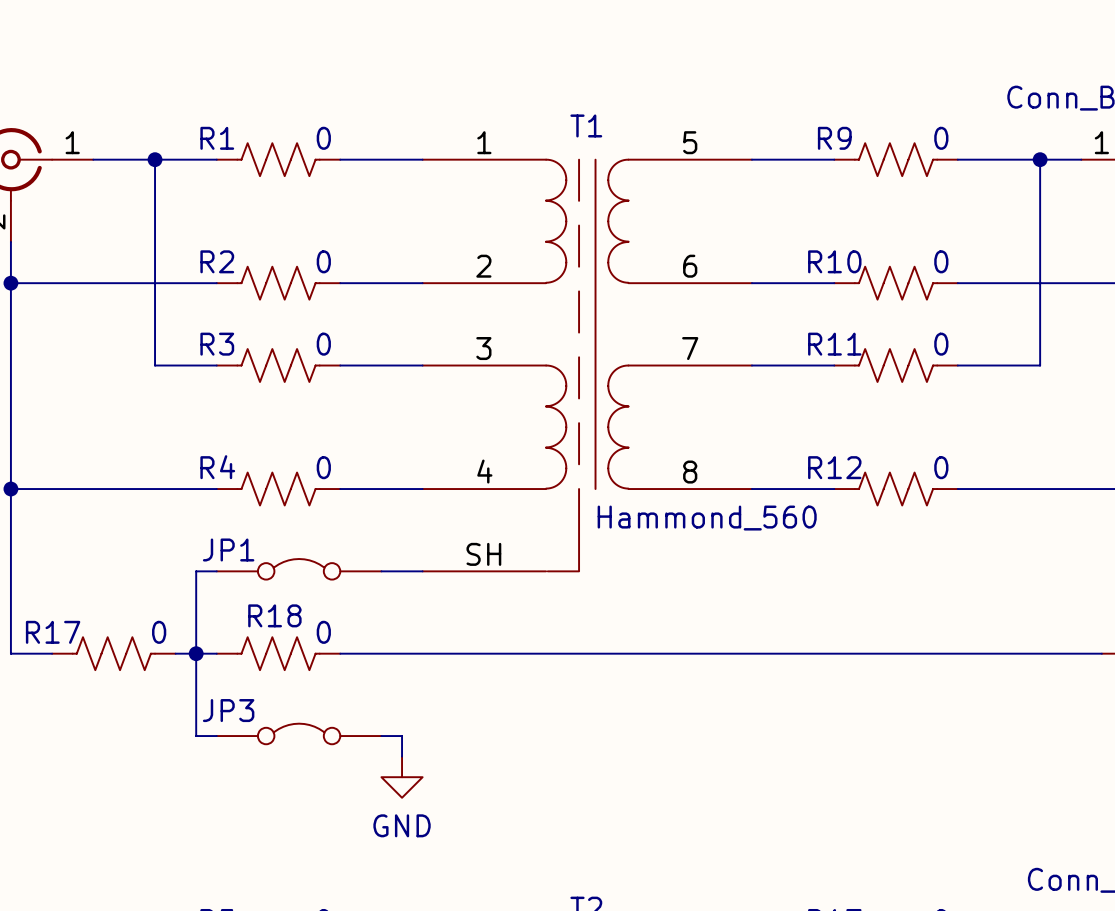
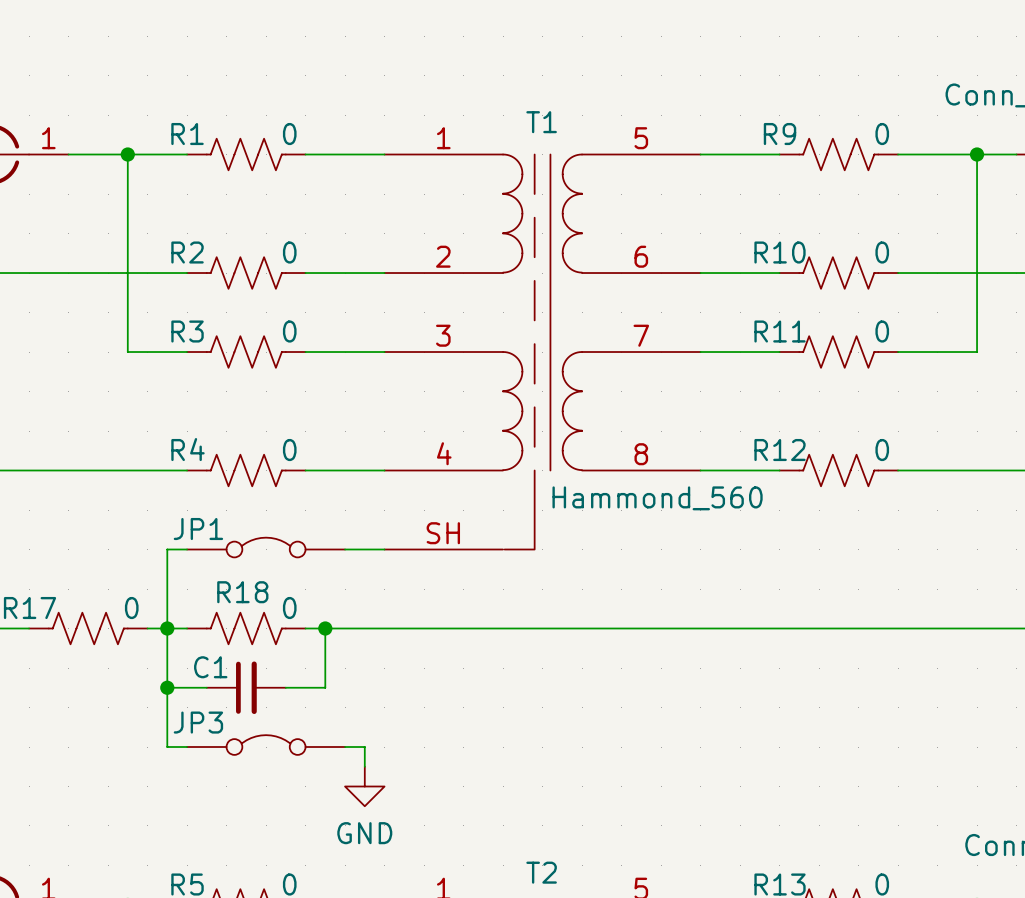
wire: none -> (325, 628) (325, 687) (285, 687)
junction: none -> (325, 628)
wire: none -> (167, 687) (206, 687)
junction: none -> (167, 687)
C1: none -> (246, 687)
JP3 position: (299, 733) -> (266, 745)
wire: (196, 736) (216, 736) -> (167, 707) (167, 747) (187, 747)
wire: (381, 736) (402, 736) (402, 756) -> (345, 747) (364, 747) (364, 766)
power symbol position: GND (402, 777) -> GND (364, 786)

